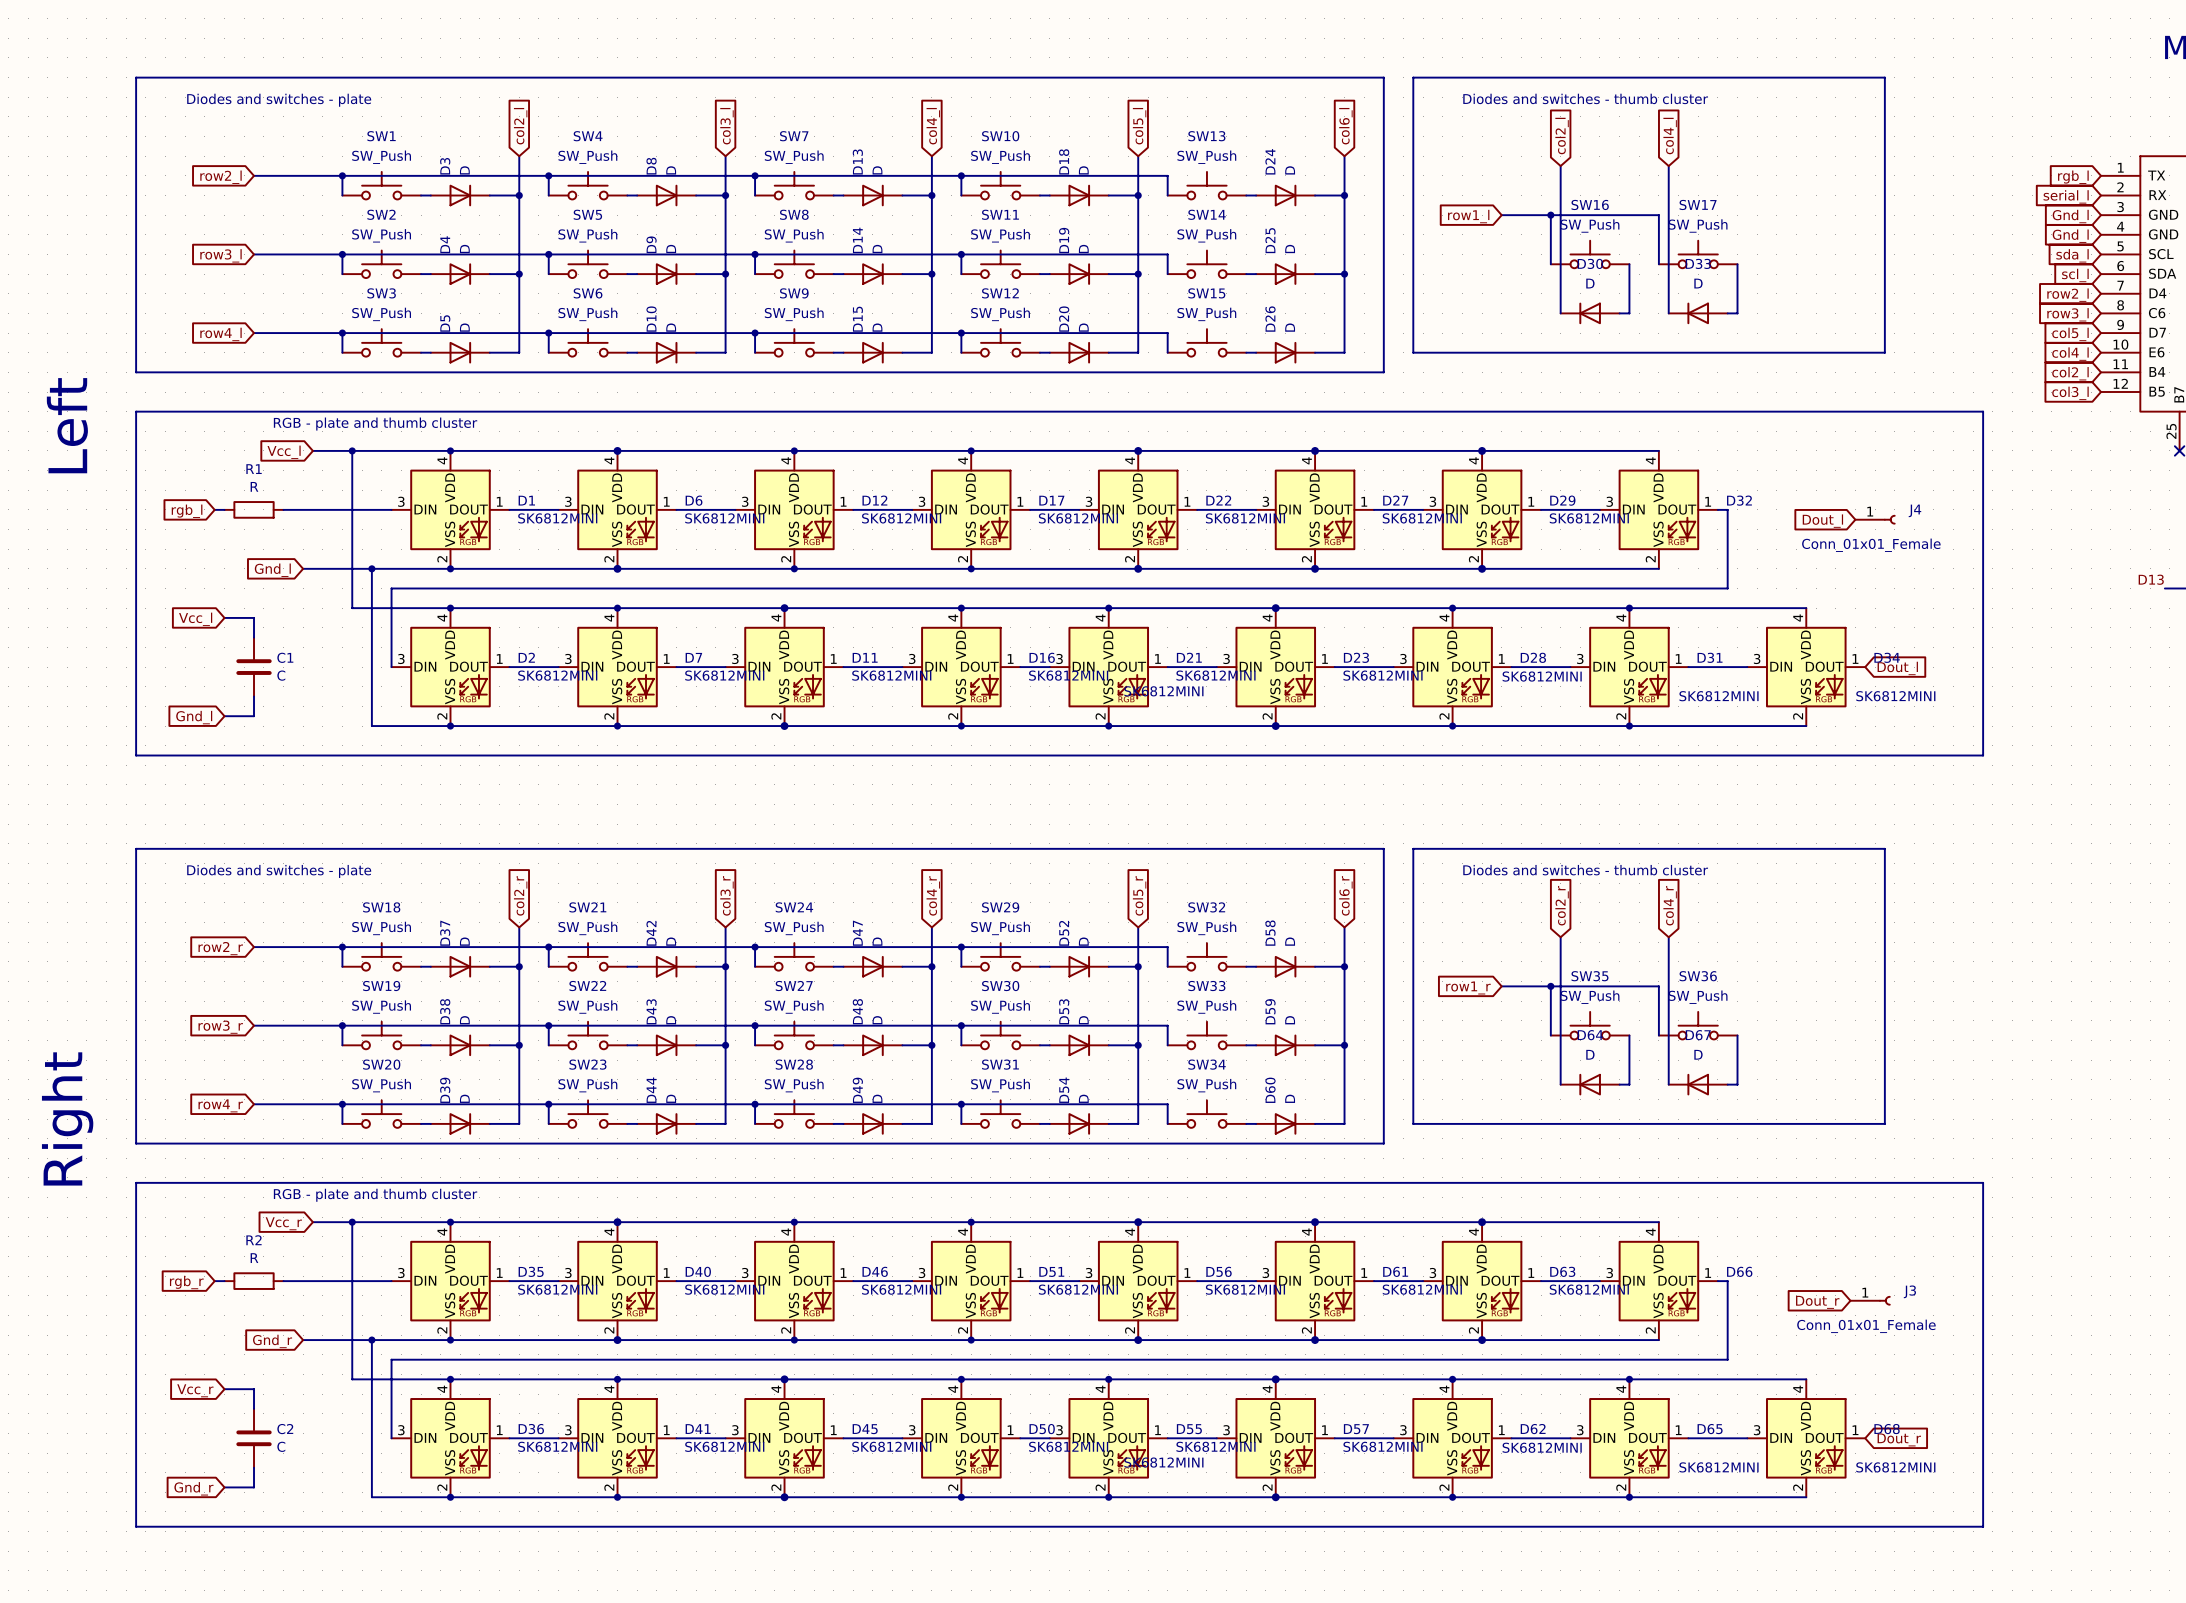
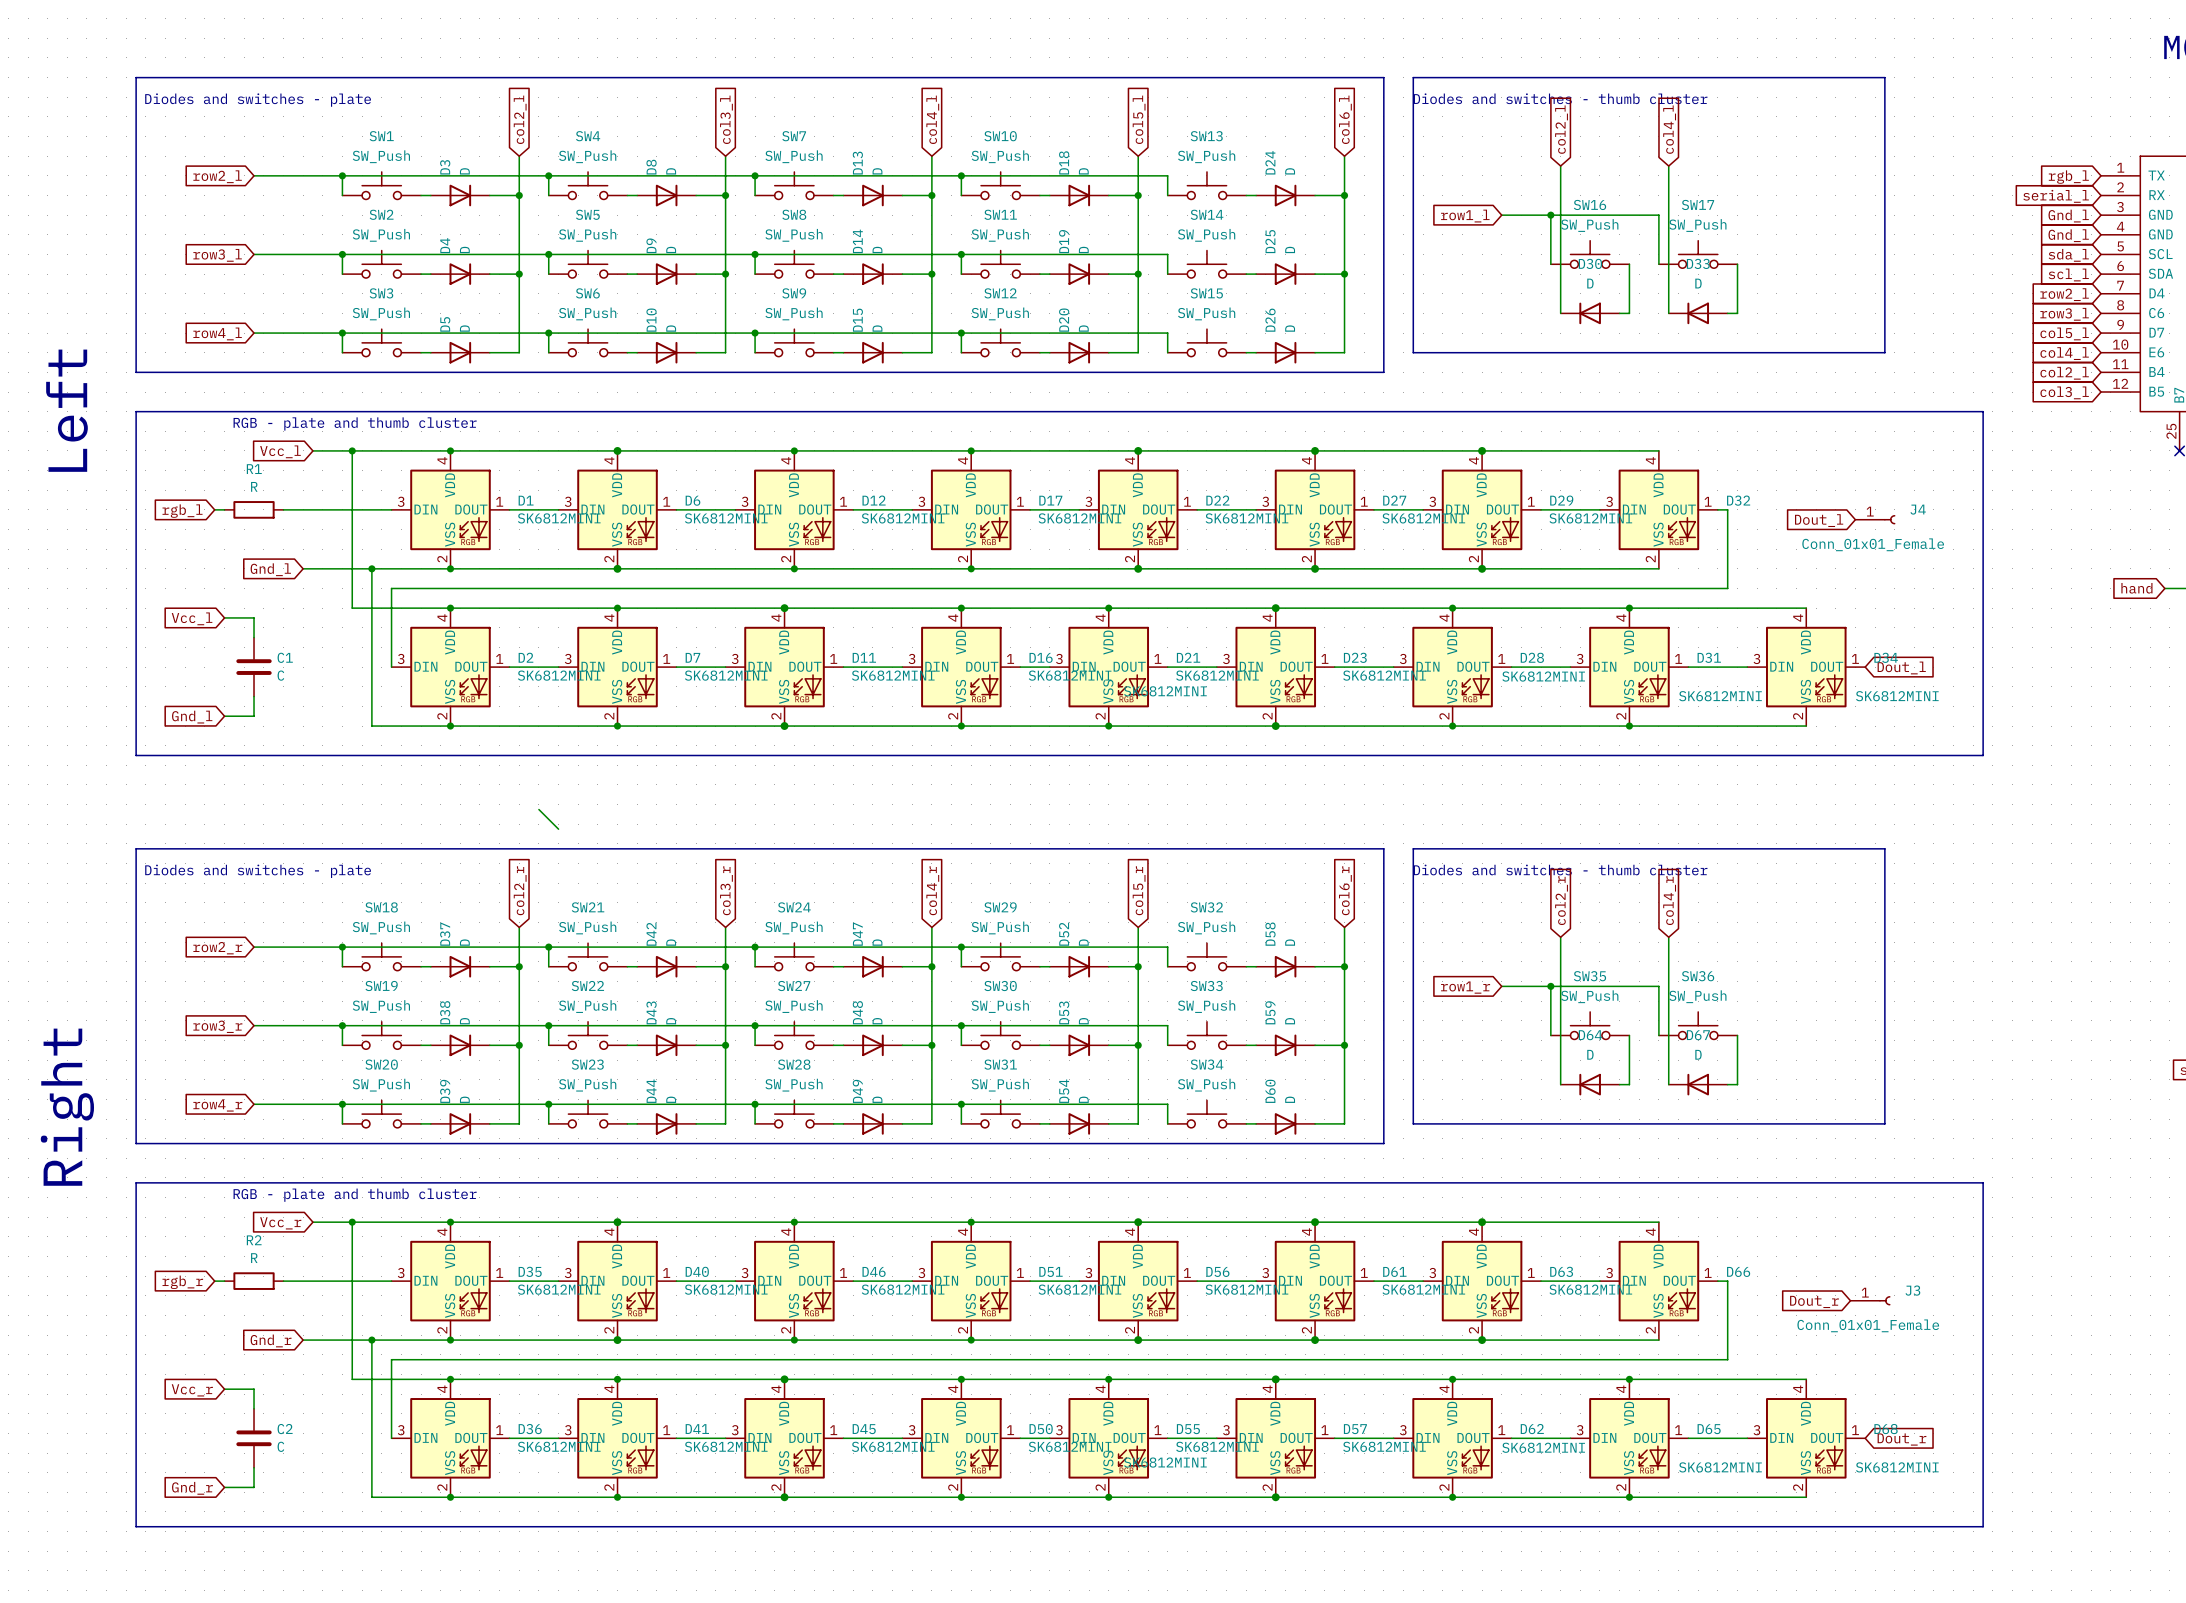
label: D13 (2151, 579) -> none
global label: none -> hand (2136, 588)
wire: none -> (538, 809) (558, 829)

